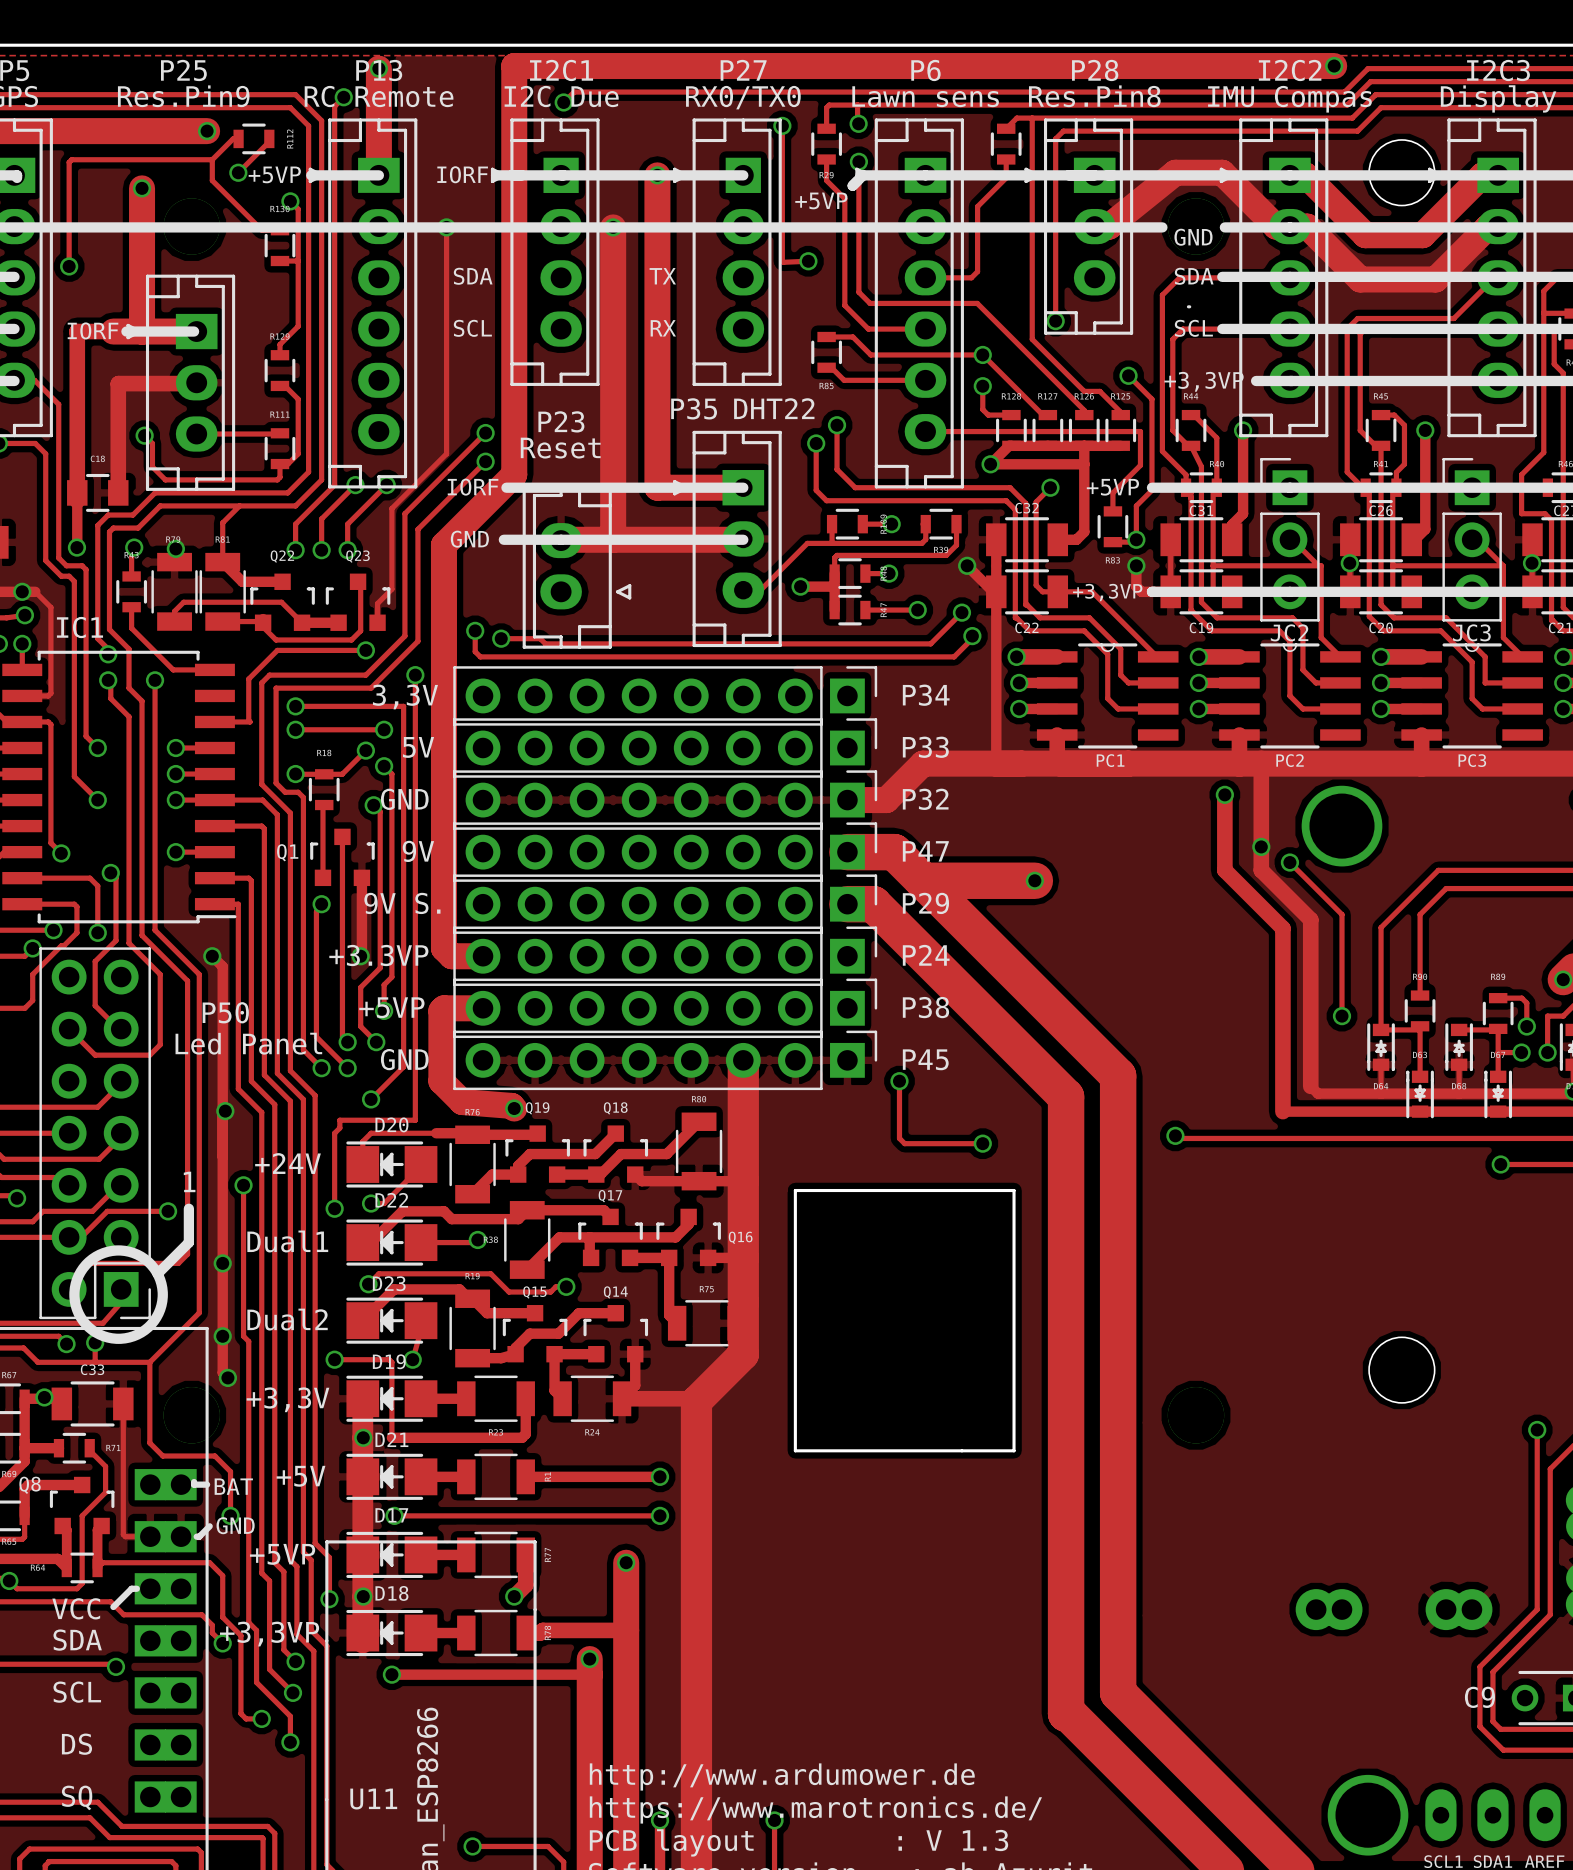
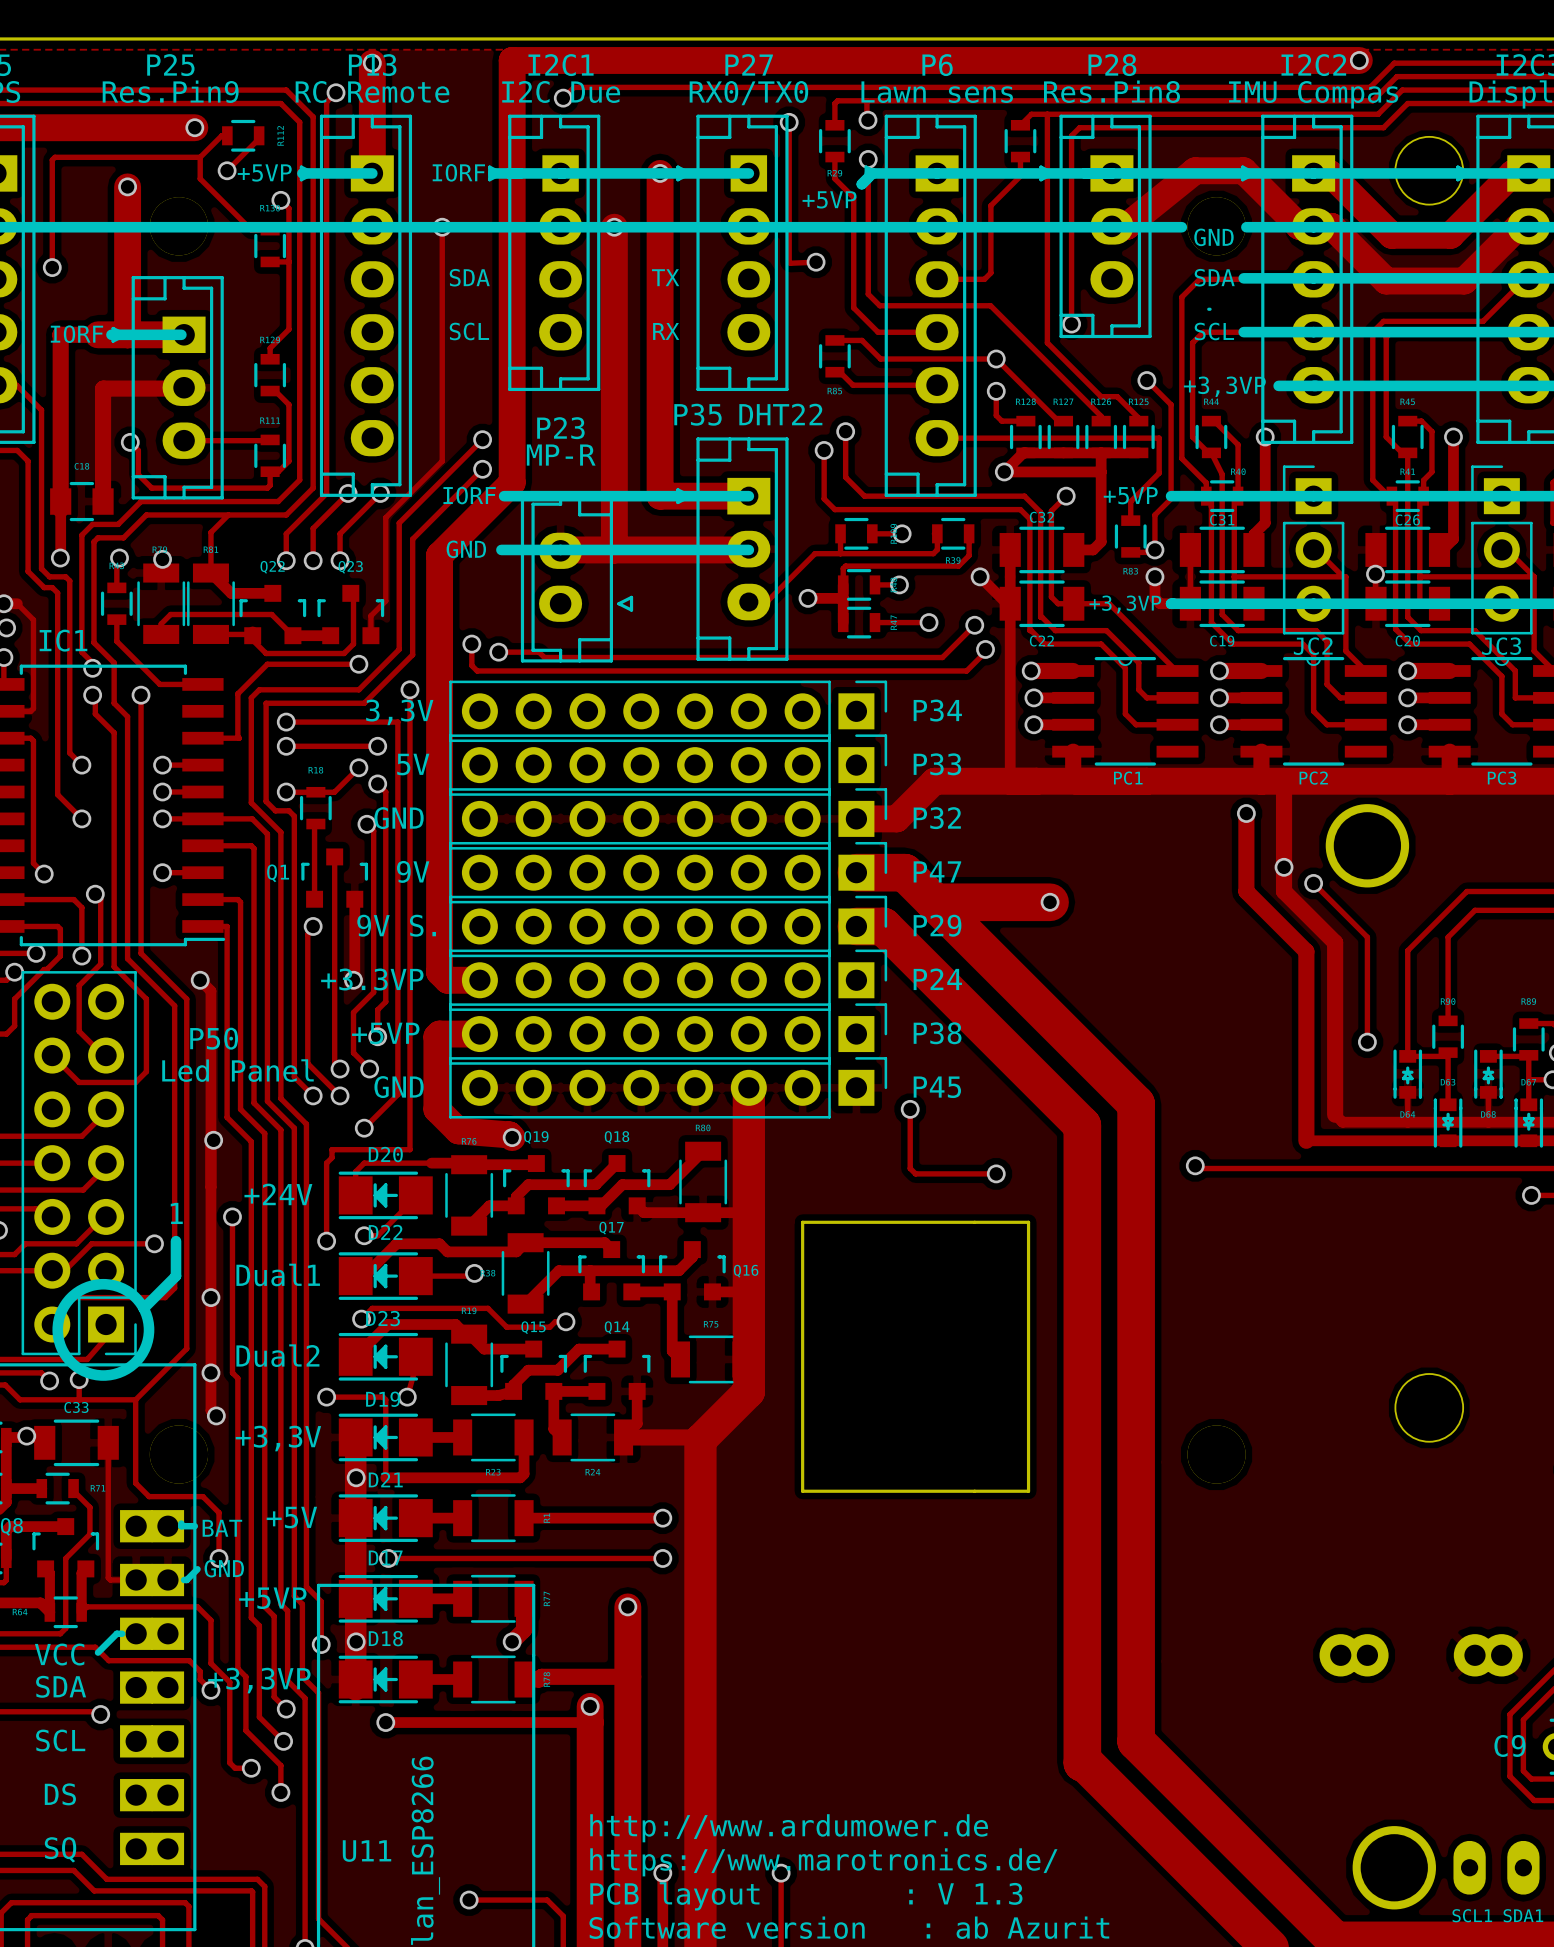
P23 value: Reset (560, 448) -> MP-R (561, 455)

